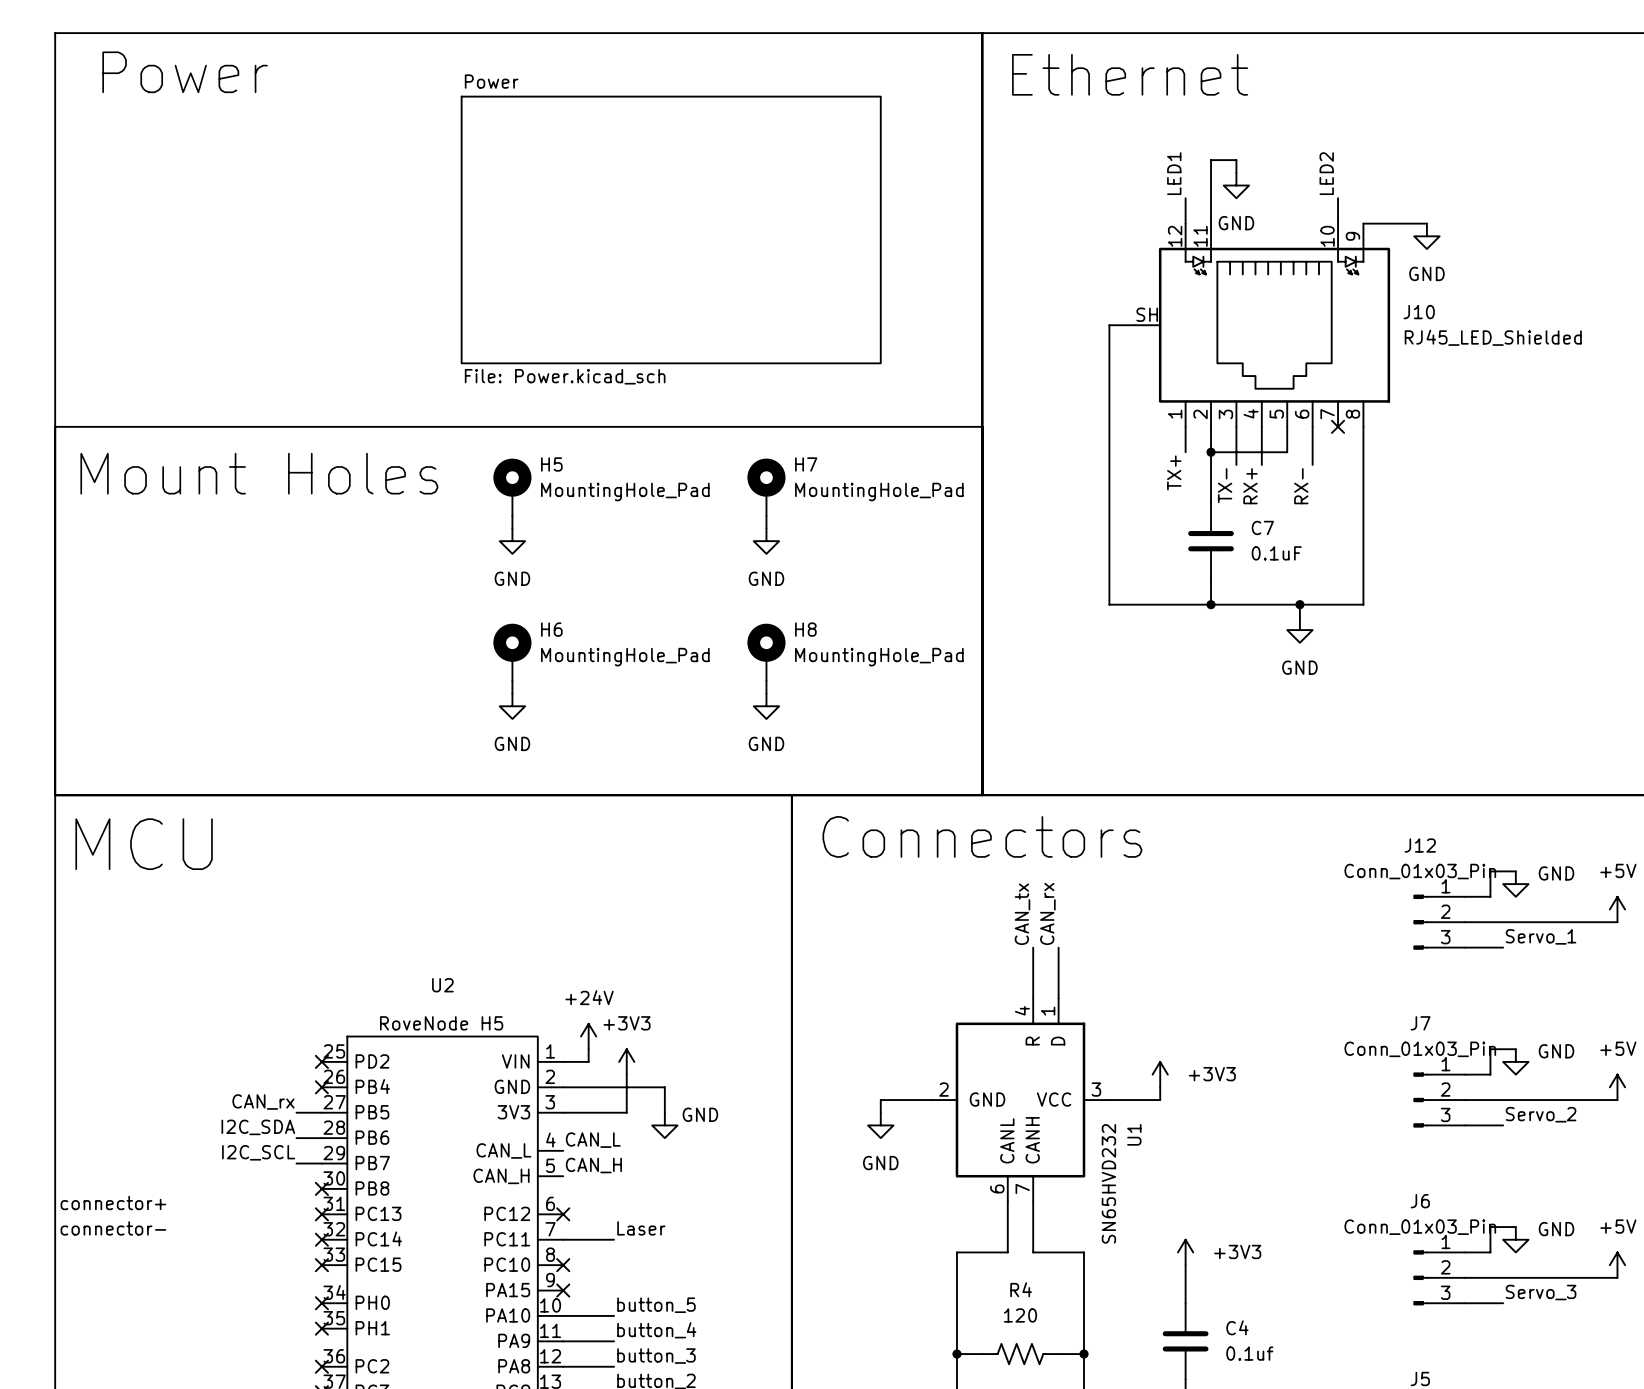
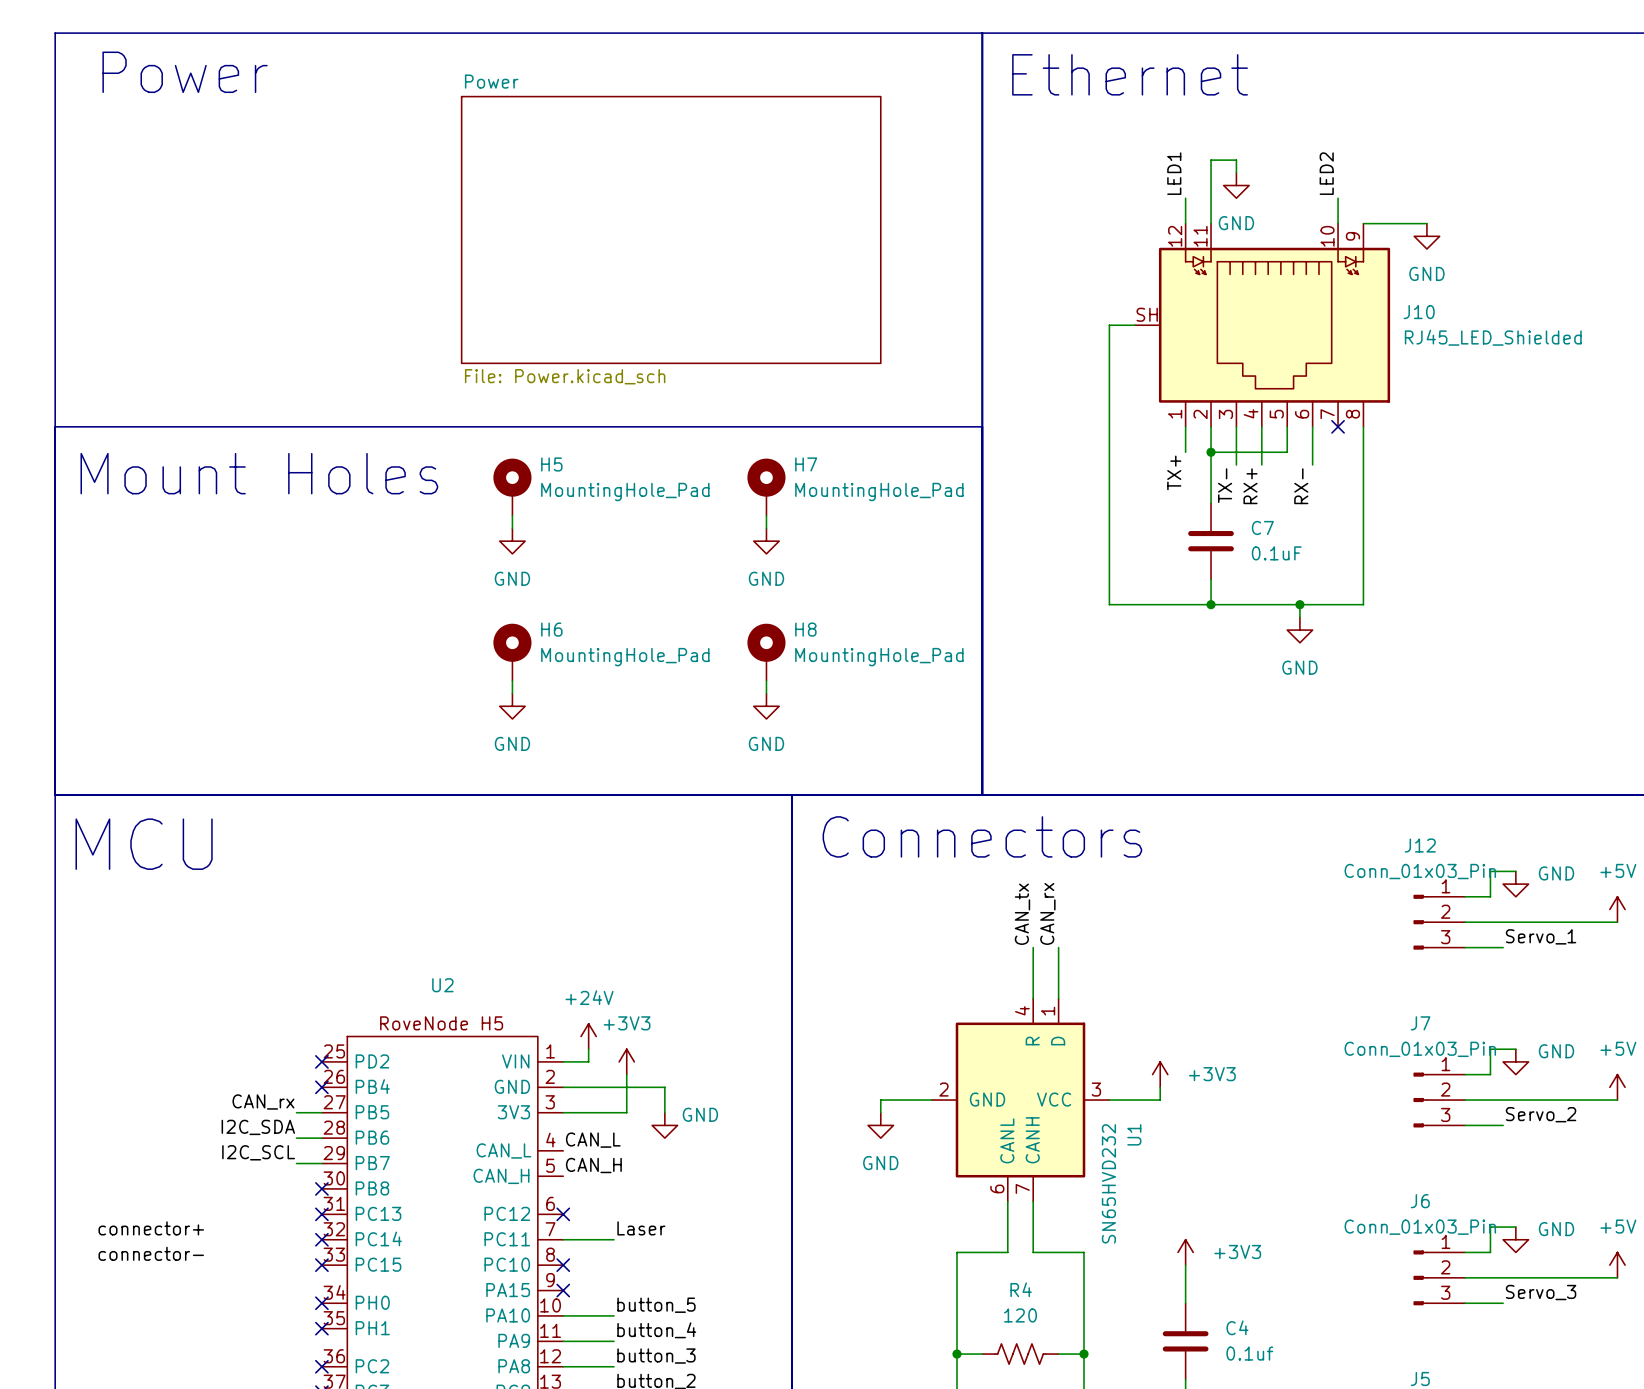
label position: connector+ (113, 1203) -> connector+ (151, 1228)
label position: connector- (113, 1228) -> connector- (151, 1253)

